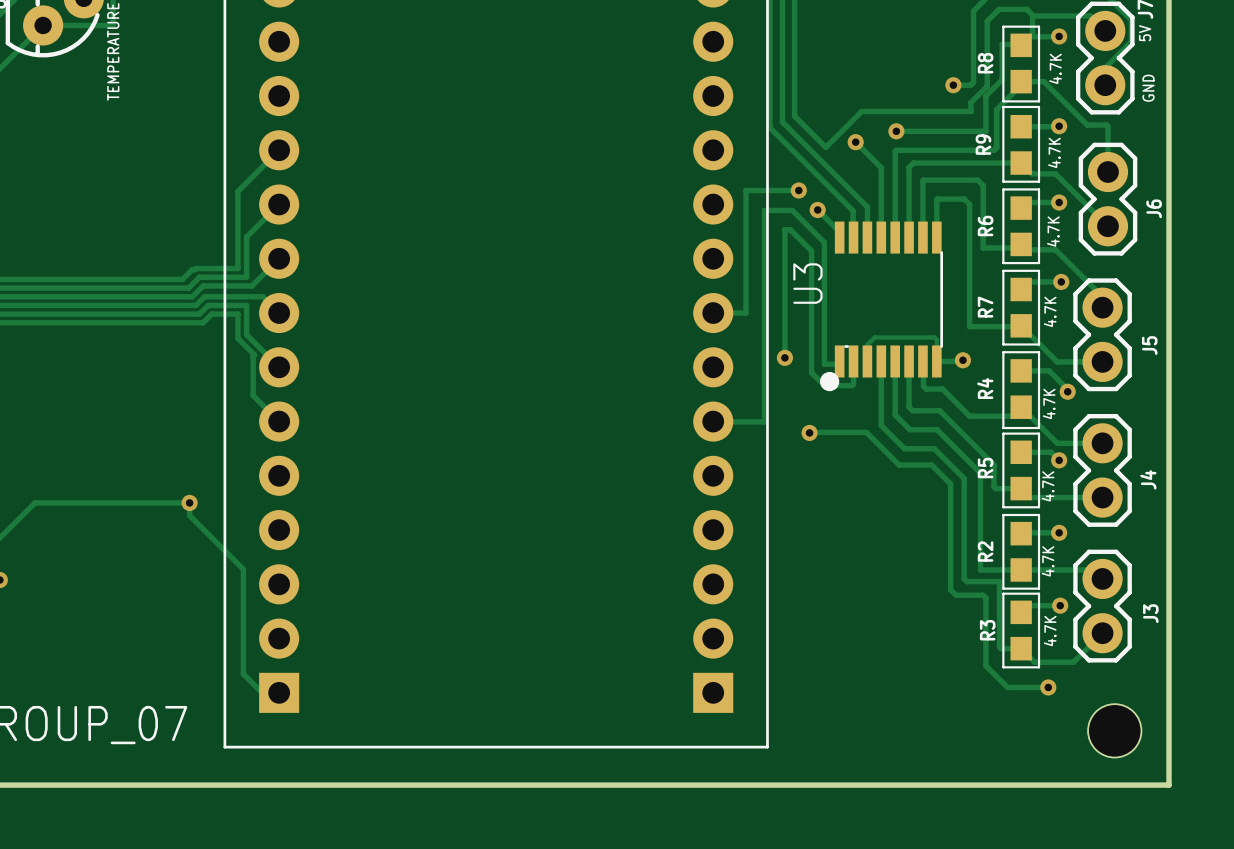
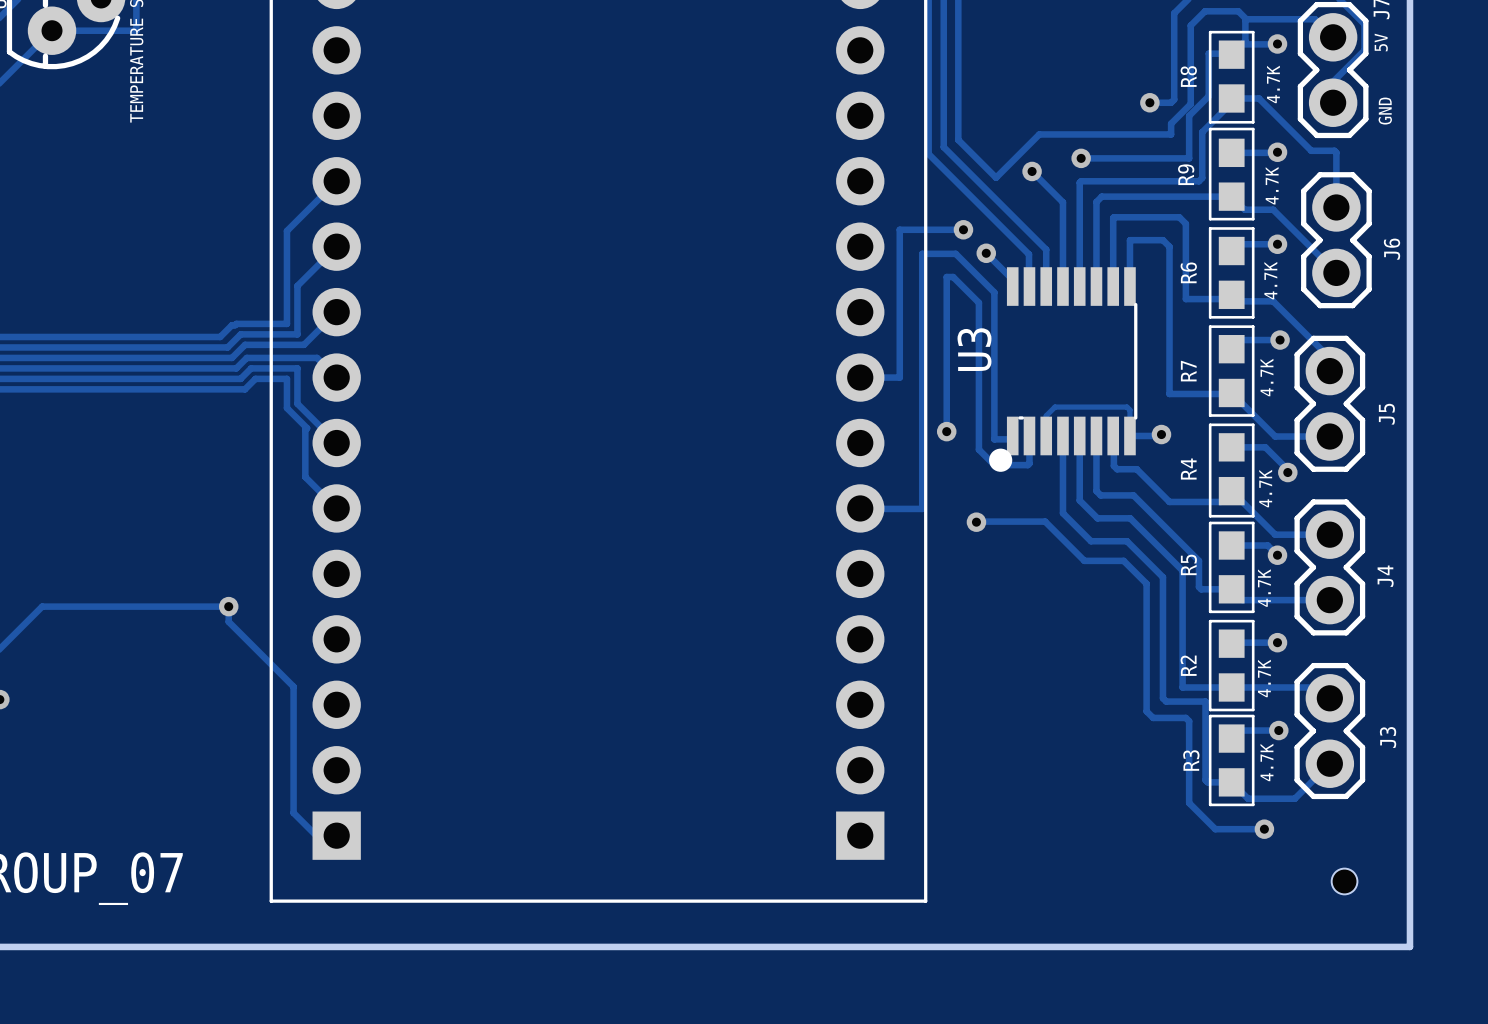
hole size: [1088, 704, 1142, 758] -> [1331, 868, 1358, 895]

